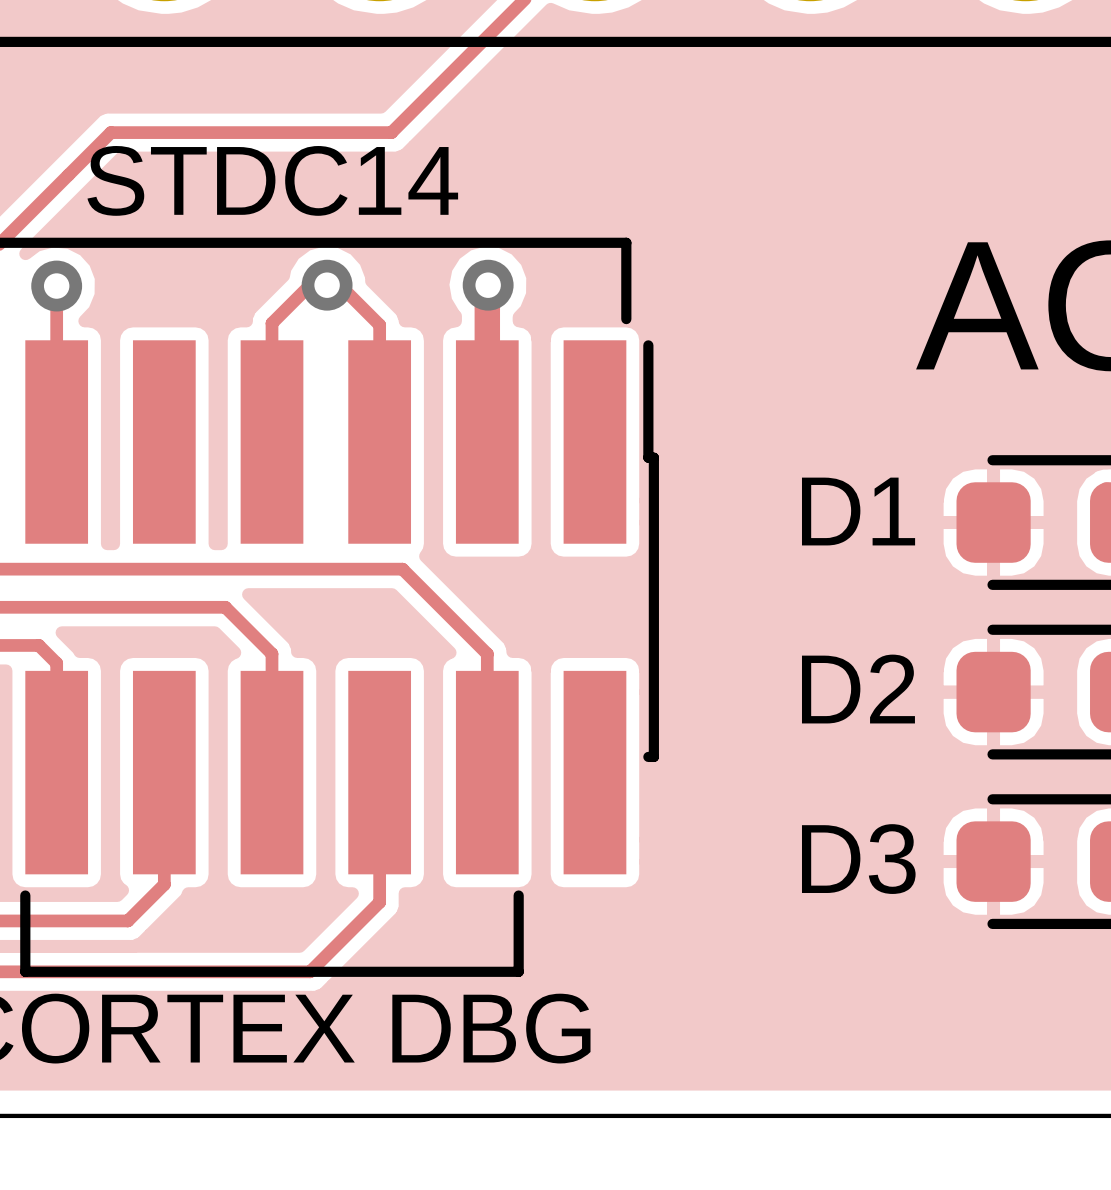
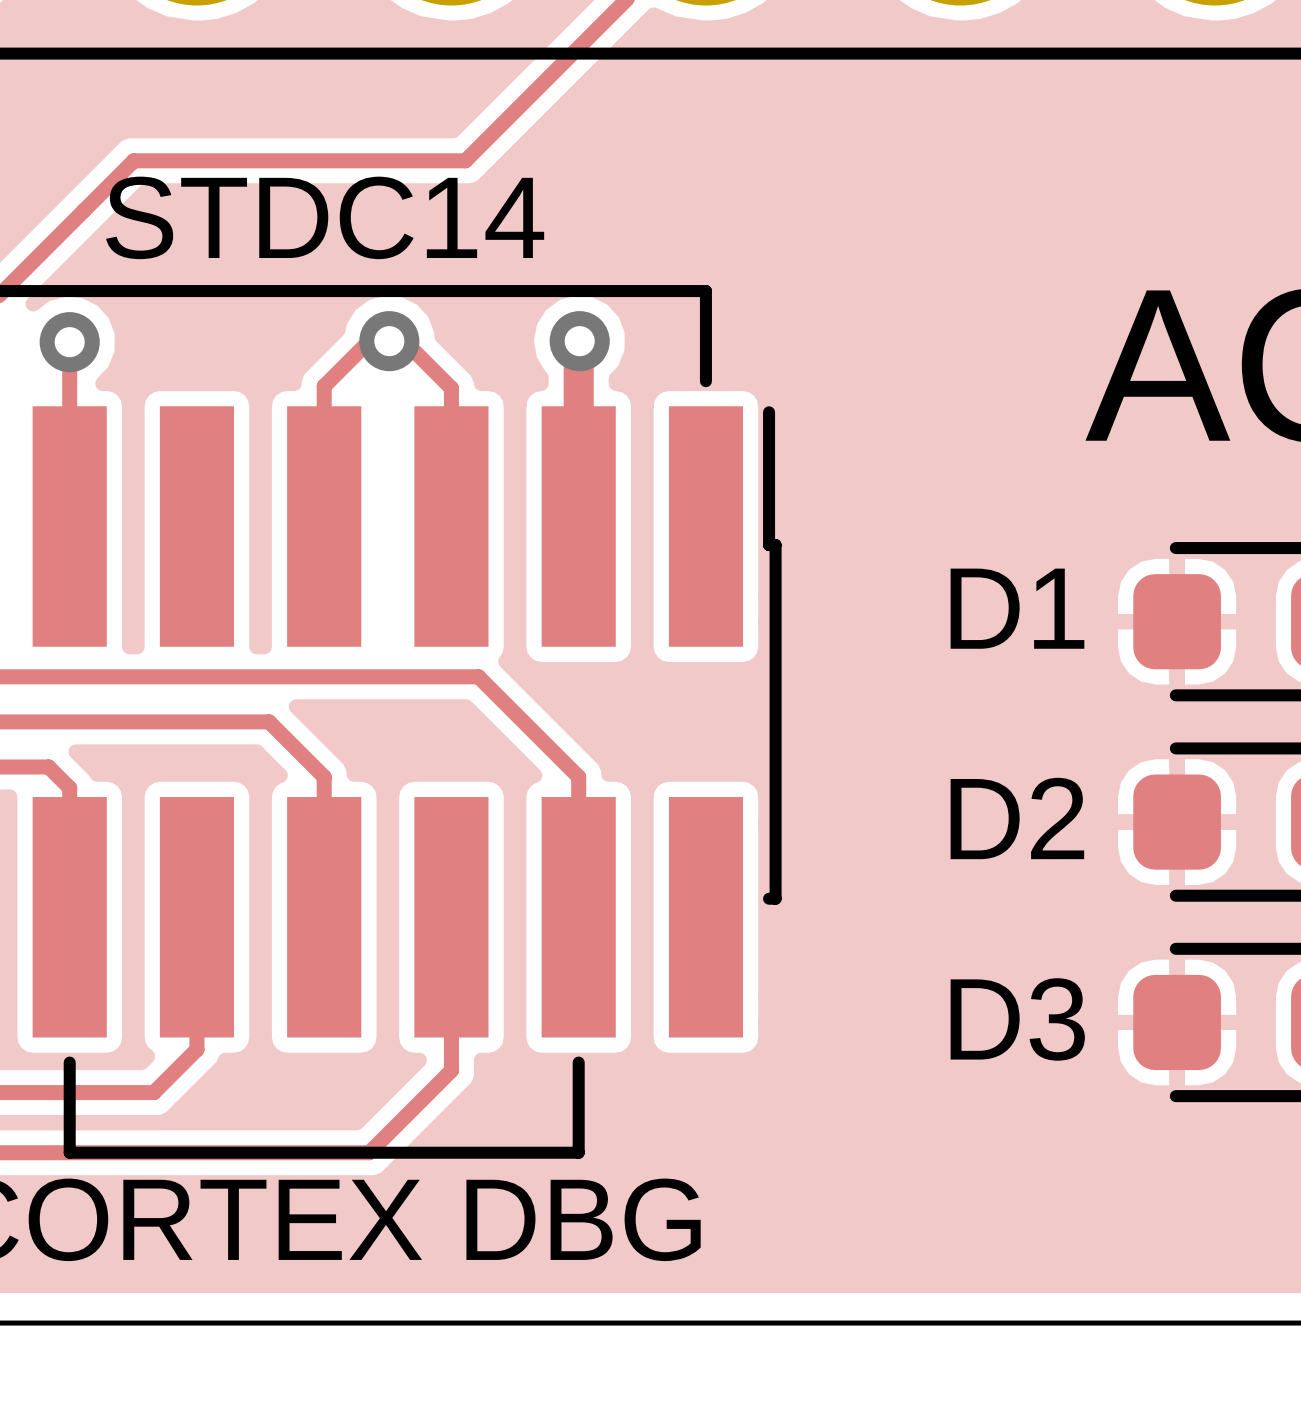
line: (594, 242) (626, 242) (626, 319) -> (705, 291) (705, 381)
line: (25, 895) (25, 971) (56, 971) -> (69, 1062) (69, 1152)
line: (518, 895) (518, 971) (487, 971) -> (578, 1062) (578, 1152)

